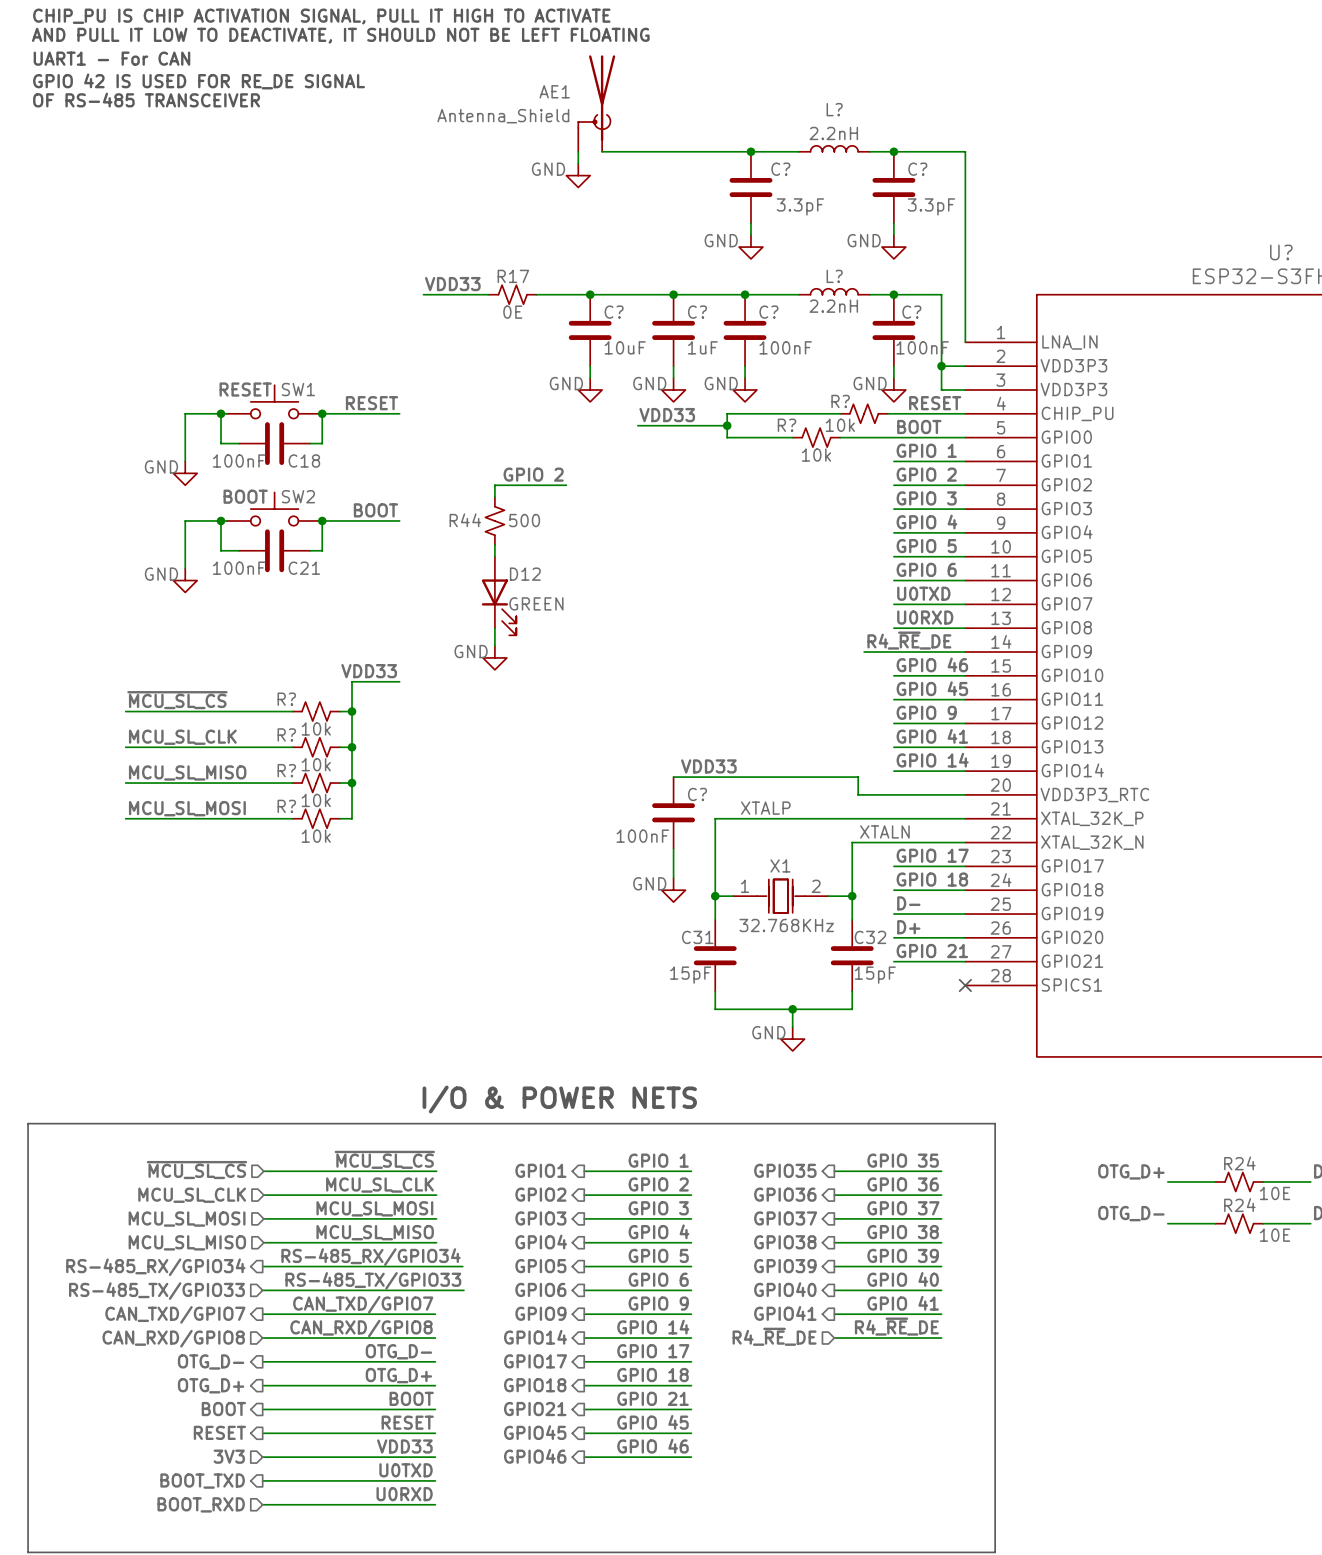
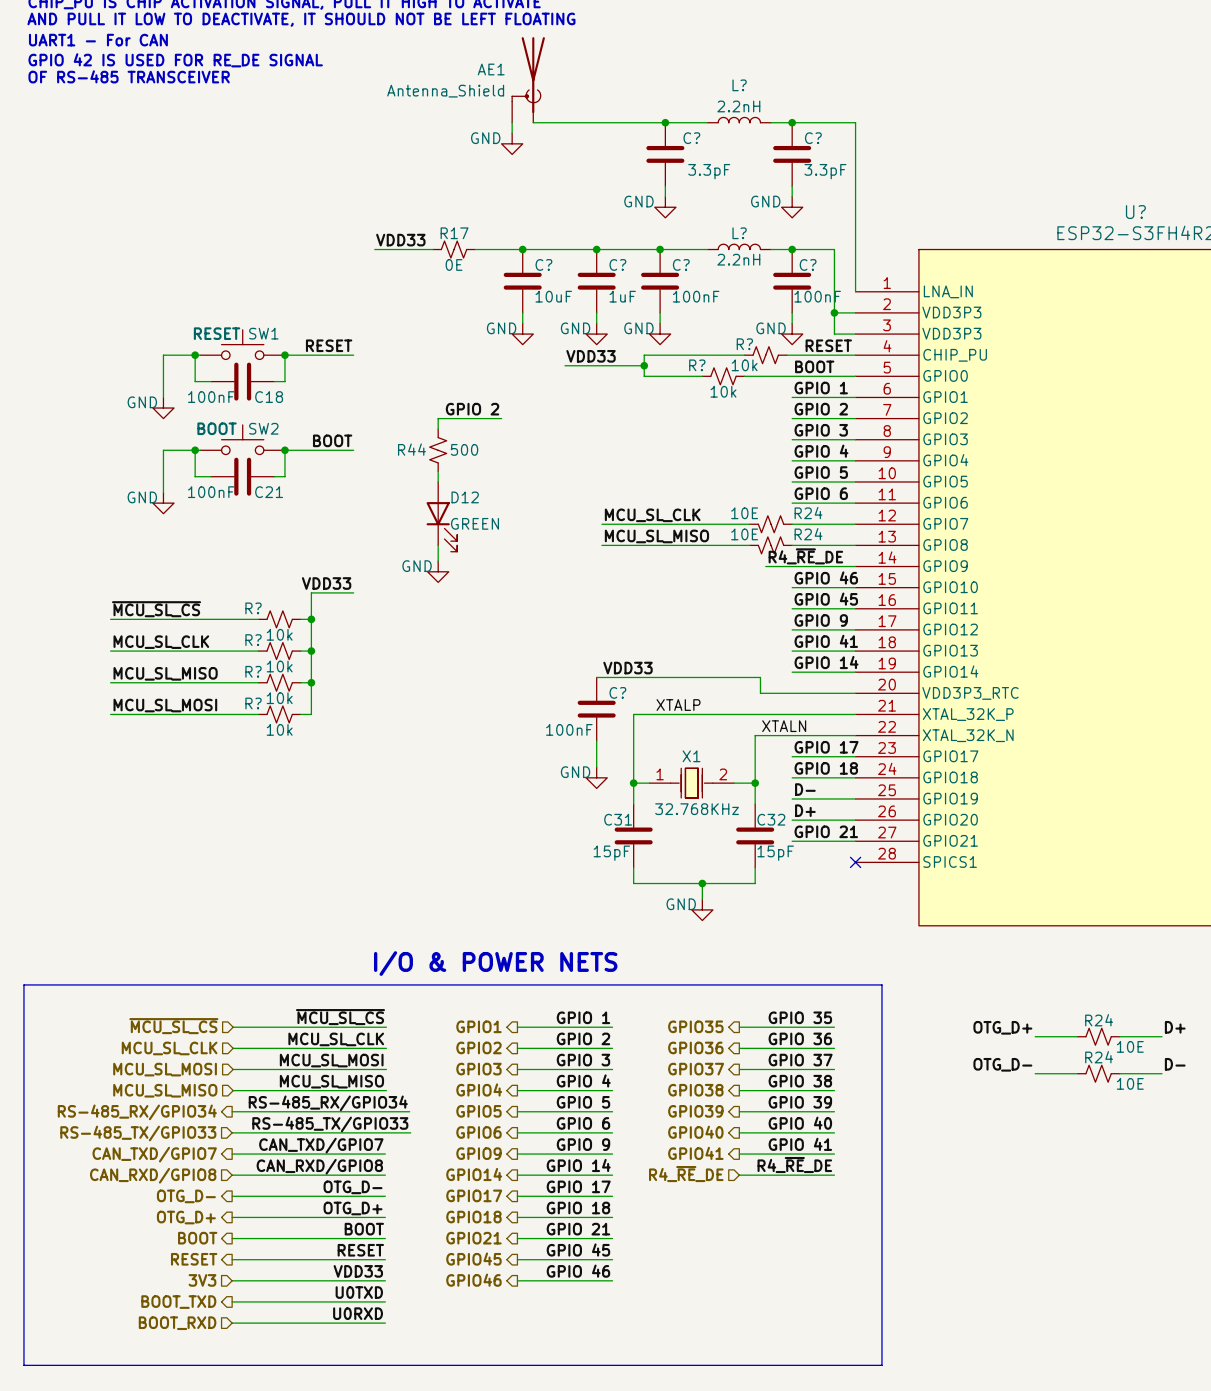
label: U0TXD (923, 593) -> none
label: none -> MCU_SL_CLK (652, 515)
wire: none -> (601, 524) (749, 524)
R24: none -> 10E (771, 524)
label: U0RXD (925, 617) -> none
label: none -> MCU_SL_MISO (656, 536)
wire: none -> (601, 545) (749, 545)
R24: none -> 10E (771, 545)

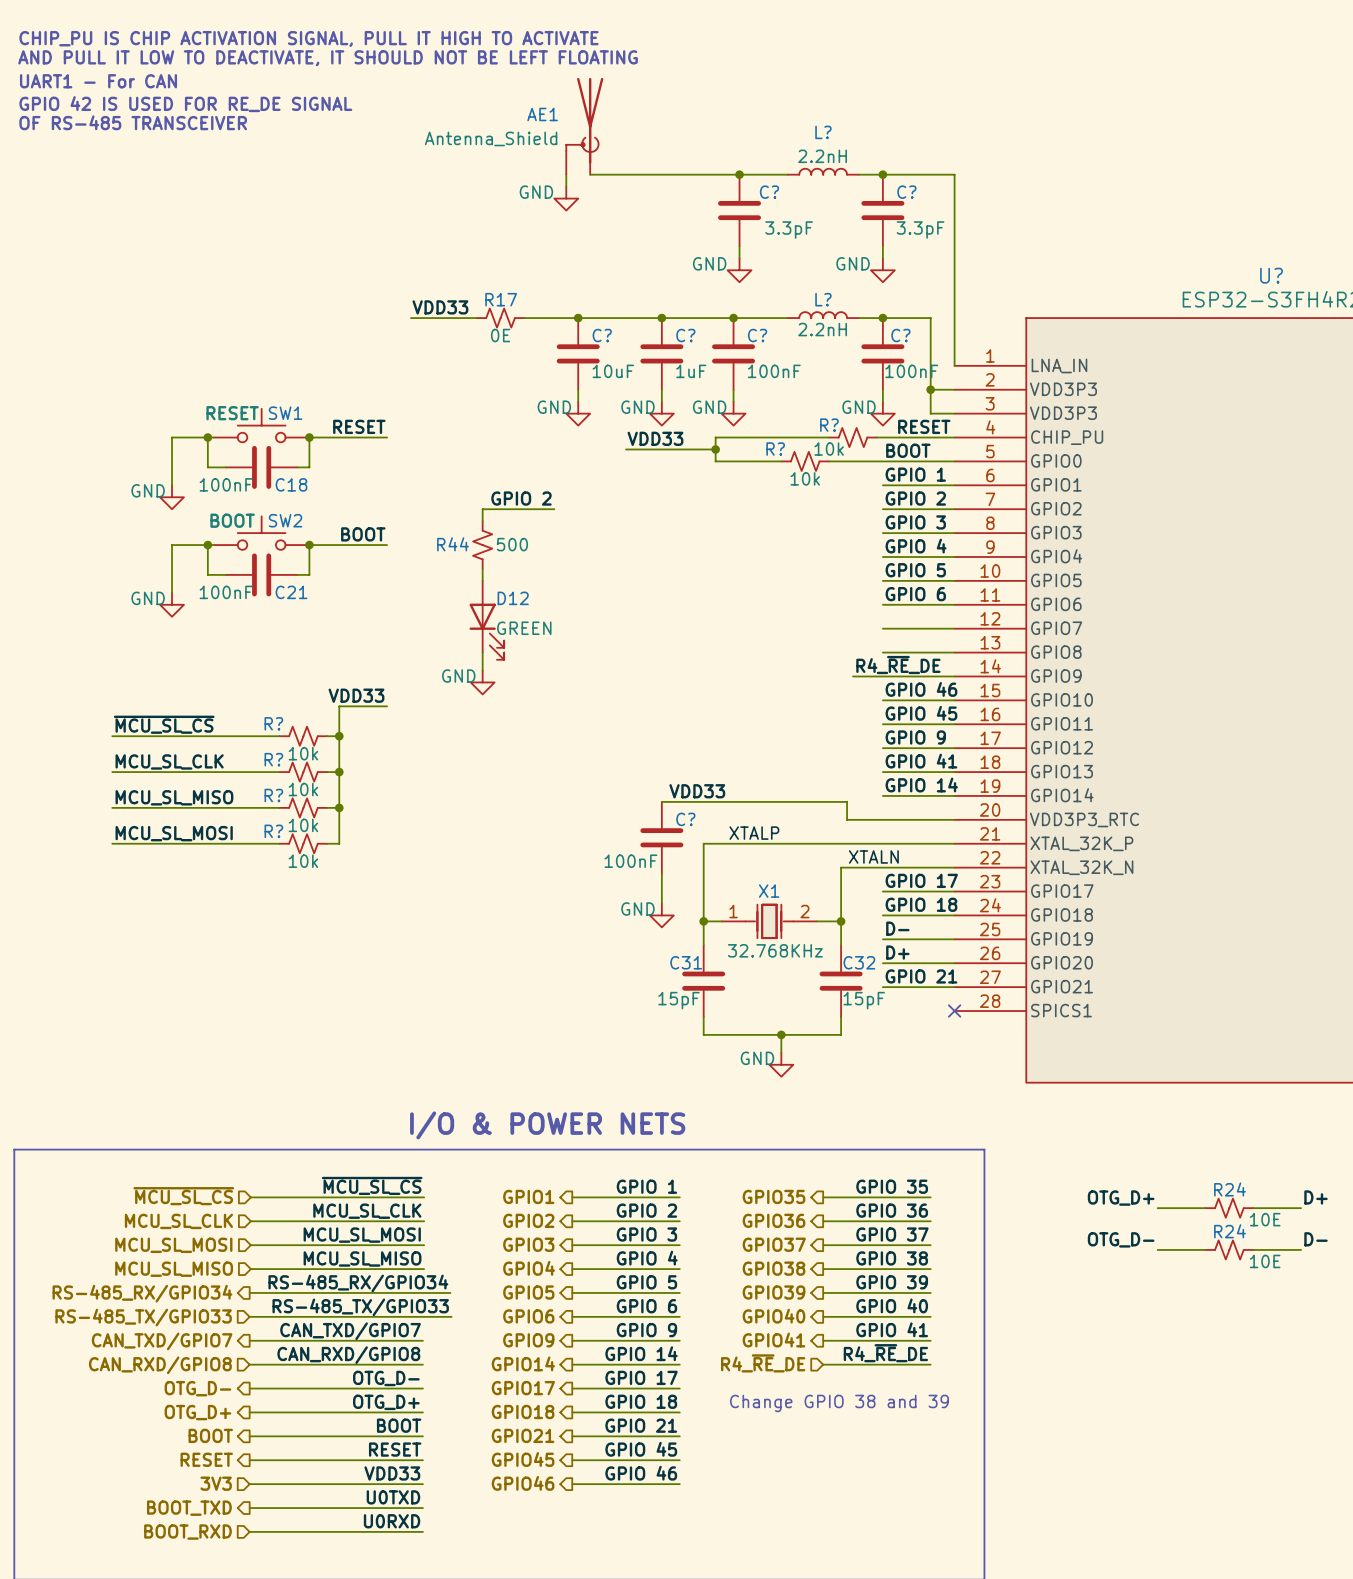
label: MCU_SL_CLK (652, 515) -> none
wire: (601, 524) (749, 524) -> none
R24: 10E (771, 524) -> none
label: MCU_SL_MISO (656, 536) -> none
wire: (601, 545) (749, 545) -> none
R24: 10E (771, 545) -> none
text: none -> Change GPIO 38 and 39 (839, 1403)

